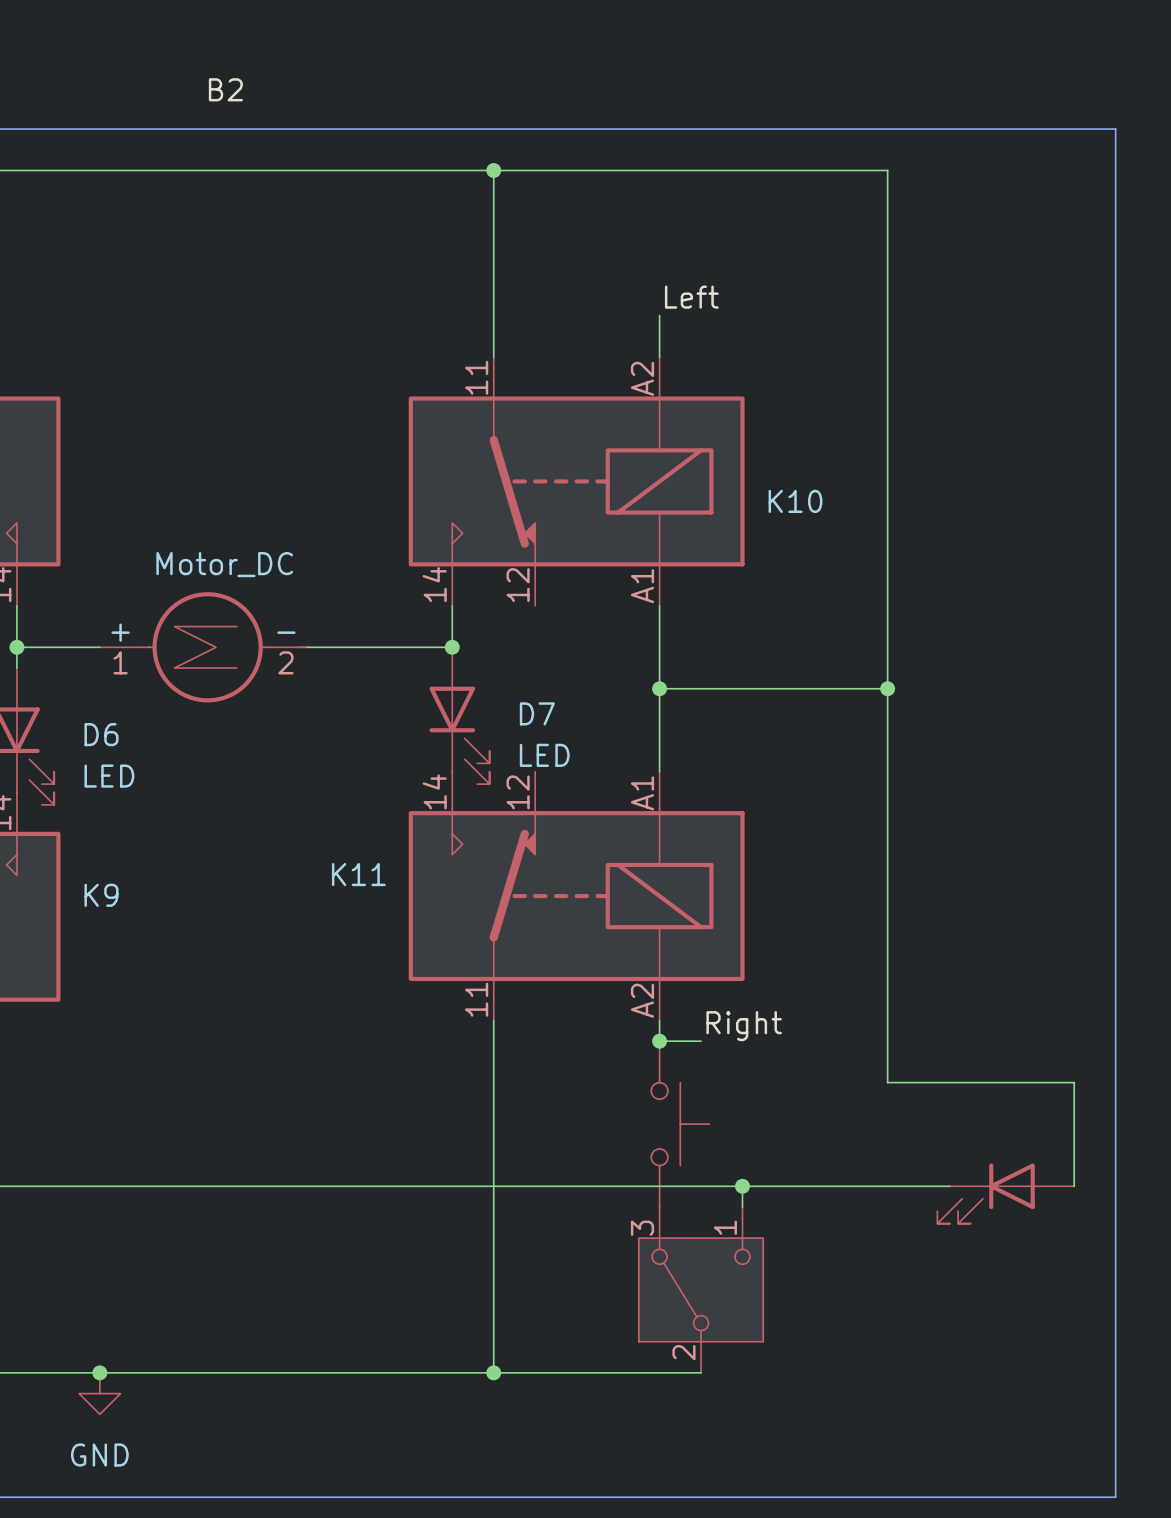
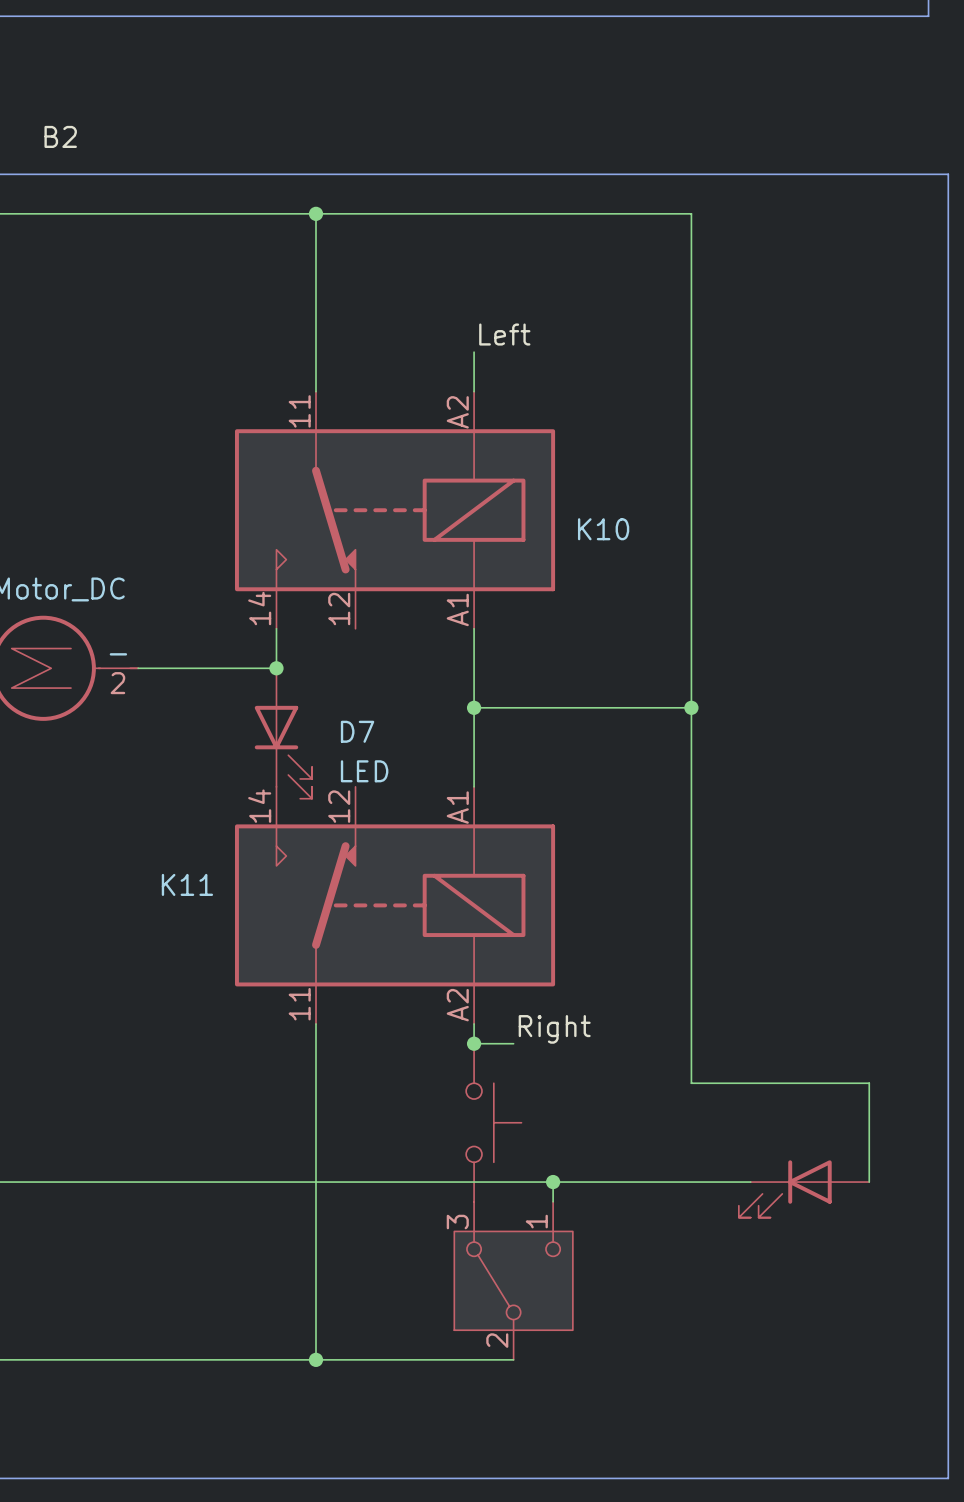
line: (1115, 129) (1115, 1497) -> (908, 174) (948, 174) (948, 1478) (908, 1478)

